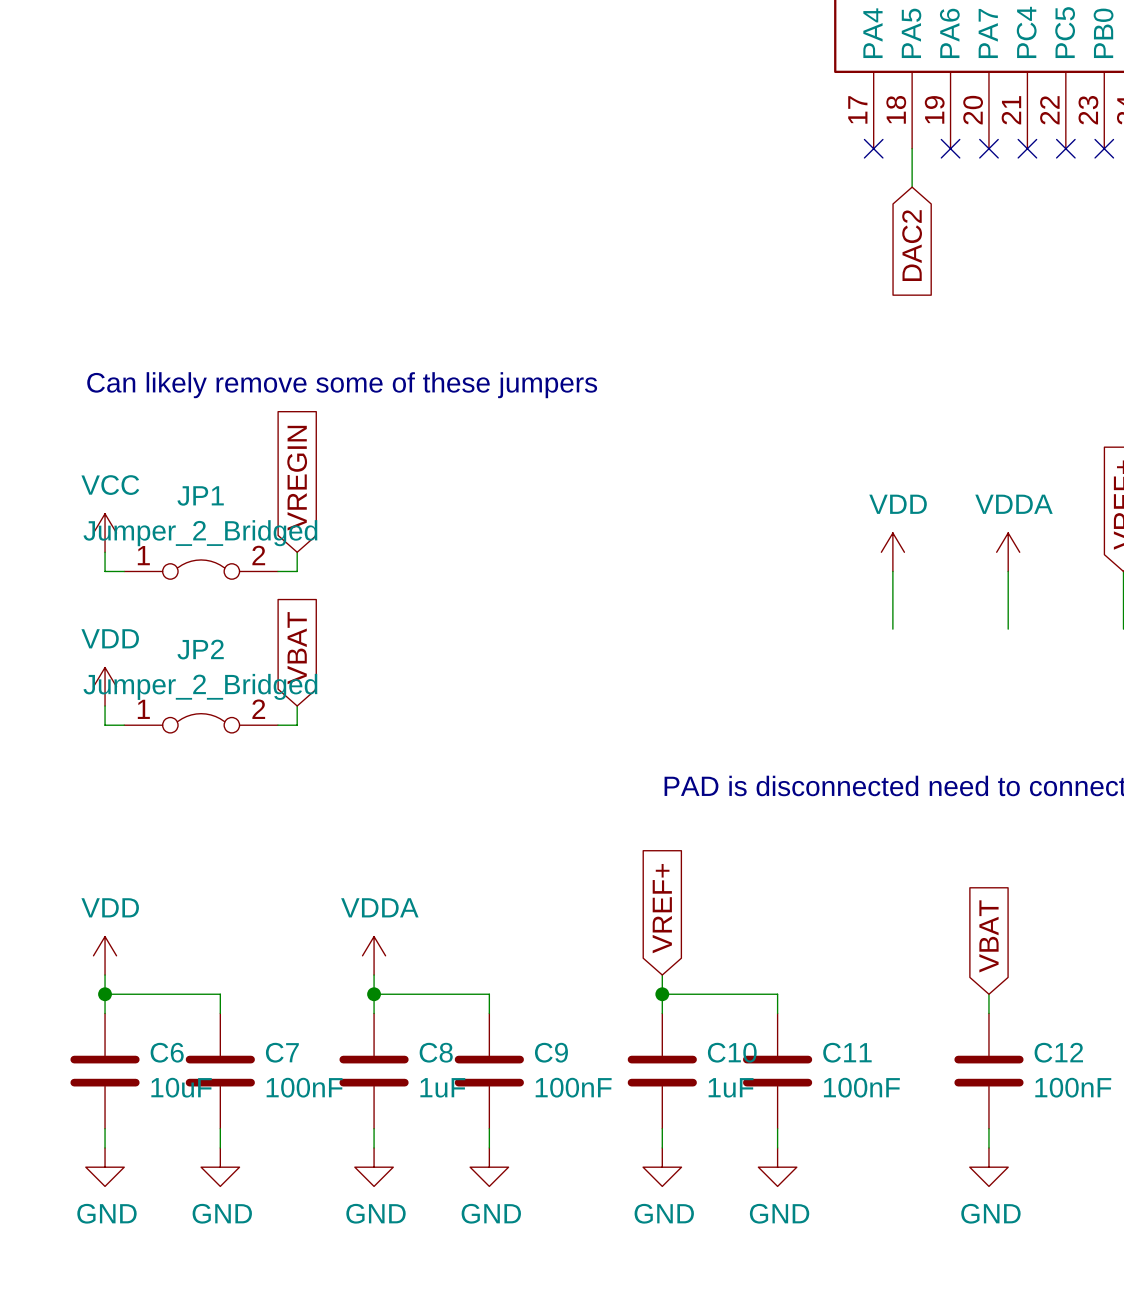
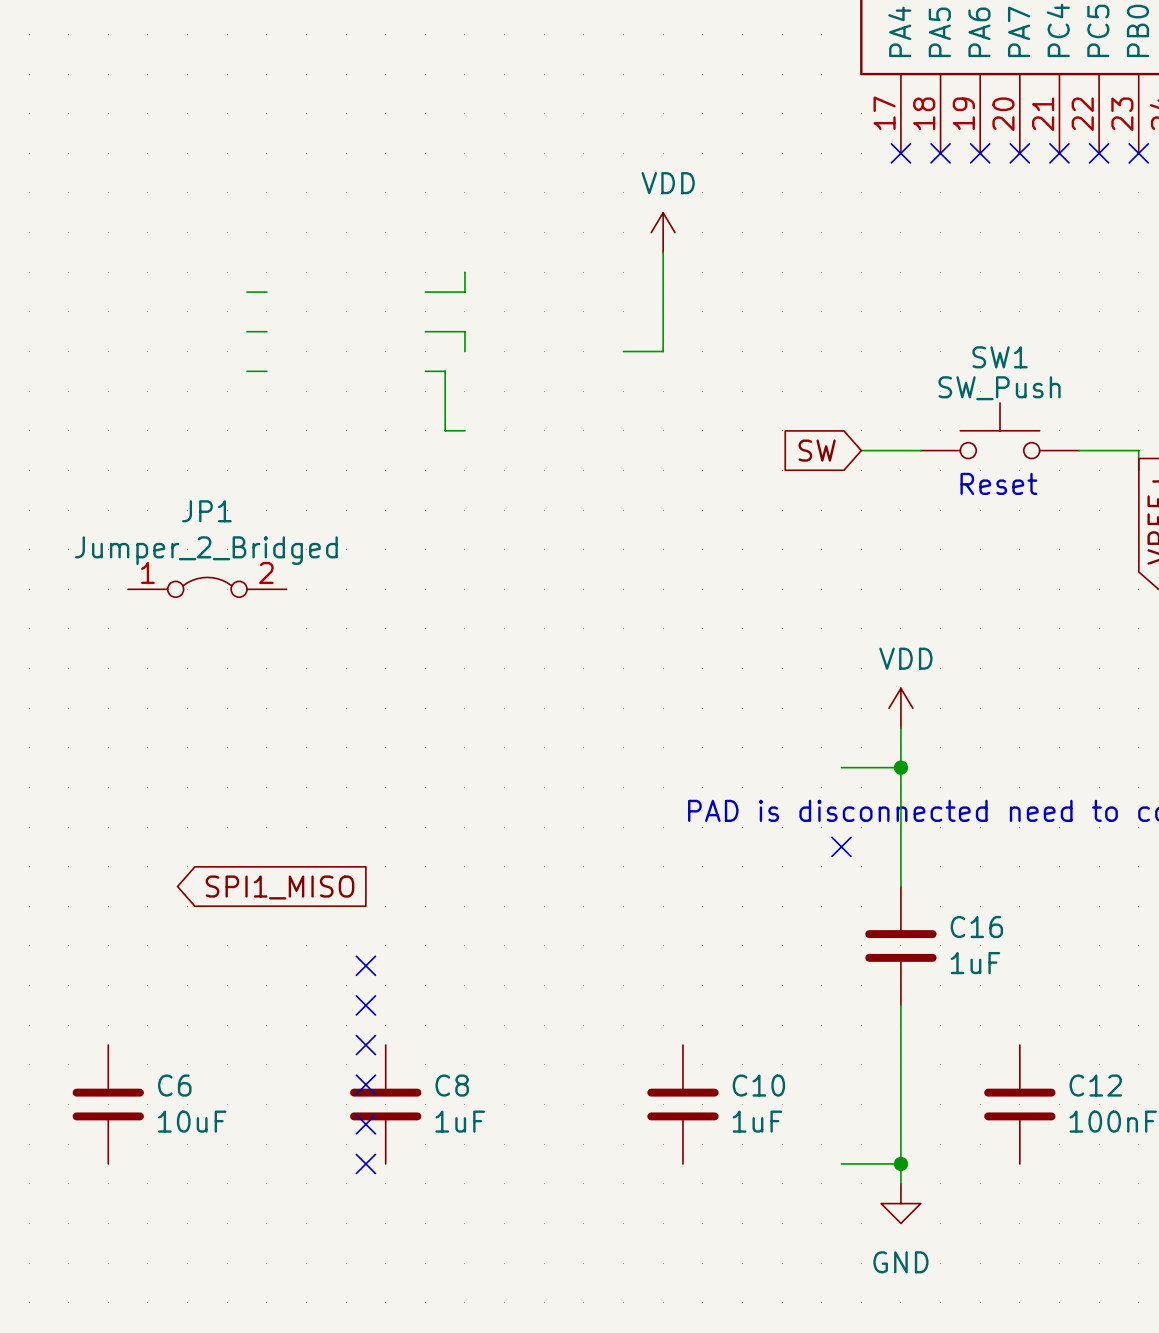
wire: (912, 148) (912, 187) -> none
no-connect mark: none -> (940, 153)
power symbol: none -> VDD (663, 232)
wire: none -> (663, 252) (663, 351) (623, 351)
global label: DAC2 (912, 245) -> none
wire: none -> (464, 272) (464, 292) (425, 292)
wire: none -> (247, 292) (266, 292)
wire: none -> (247, 331) (266, 331)
wire: none -> (425, 331) (464, 331) (464, 351)
wire: none -> (247, 371) (266, 371)
wire: none -> (425, 371) (445, 371) (445, 430) (464, 430)
text: Can likely remove some of these jumpers (342, 385) -> none
SW1: none -> SW_Push (1000, 430)
global label: none -> SW (817, 450)
wire: none -> (861, 450) (920, 450)
wire: none -> (1079, 450) (1138, 450) (1138, 470)
text: none -> Reset (998, 483)
global label: VREGIN (297, 478) -> none
power symbol: VCC (105, 533) -> none
wire: (105, 552) (105, 571) (124, 571) -> none
wire: (297, 552) (297, 571) (277, 571) -> none
power symbol position: VDD (892, 552) -> VDD (900, 708)
power symbol: VDDA (1008, 552) -> none
wire: (892, 571) (892, 629) -> none
wire: (1008, 571) (1008, 629) -> none
wire: (1123, 571) (1123, 629) -> none
global label: VBAT (297, 648) -> none
power symbol: VDD (105, 686) -> none
wire: (105, 705) (105, 725) (124, 725) -> none
wire: (297, 705) (297, 725) (277, 725) -> none
wire: none -> (900, 728) (900, 886)
JP2: Jumper_2_Bridged (201, 723) -> none
wire: none -> (841, 767) (900, 767)
junction: none -> (900, 767)
no-connect mark: none -> (841, 846)
global label: none -> SPI1_MISO (280, 887)
global label: VREF+ (662, 908) -> none
C16: none -> 1uF (900, 945)
no-connect mark: none -> (365, 965)
global label: VBAT (988, 936) -> none
power symbol: VDD (105, 955) -> none
power symbol: VDDA (374, 955) -> none
wire: (105, 975) (105, 1013) -> none
no-connect mark: none -> (365, 1005)
wire: (374, 975) (374, 1013) -> none
wire: (662, 975) (662, 1013) -> none
wire: none -> (900, 1005) (900, 1183)
wire: (105, 994) (220, 994) (220, 1013) -> none
junction: (105, 994) -> none
wire: (374, 994) (489, 994) (489, 1013) -> none
junction: (374, 994) -> none
wire: (662, 994) (777, 994) (777, 1013) -> none
junction: (662, 994) -> none
wire: (988, 994) (988, 1013) -> none
no-connect mark: none -> (365, 1045)
no-connect mark: none -> (365, 1084)
C7: 100nF (220, 1071) -> none
C9: 100nF (489, 1071) -> none
C11: 100nF (777, 1071) -> none
no-connect mark: none -> (365, 1124)
wire: (105, 1128) (105, 1147) -> none
wire: (220, 1128) (220, 1147) -> none
no-connect mark: none -> (365, 1163)
wire: (374, 1128) (374, 1147) -> none
wire: (489, 1128) (489, 1147) -> none
wire: (662, 1128) (662, 1147) -> none
wire: (777, 1128) (777, 1147) -> none
wire: none -> (841, 1163) (900, 1163)
junction: none -> (900, 1163)
wire: (988, 1128) (988, 1147) -> none
power symbol: GND (105, 1167) -> none
power symbol: GND (220, 1167) -> none
power symbol: GND (374, 1167) -> none
power symbol: GND (489, 1167) -> none
power symbol: GND (662, 1167) -> none
power symbol: GND (777, 1167) -> none
power symbol: none -> GND (900, 1203)
power symbol: GND (988, 1167) -> none

